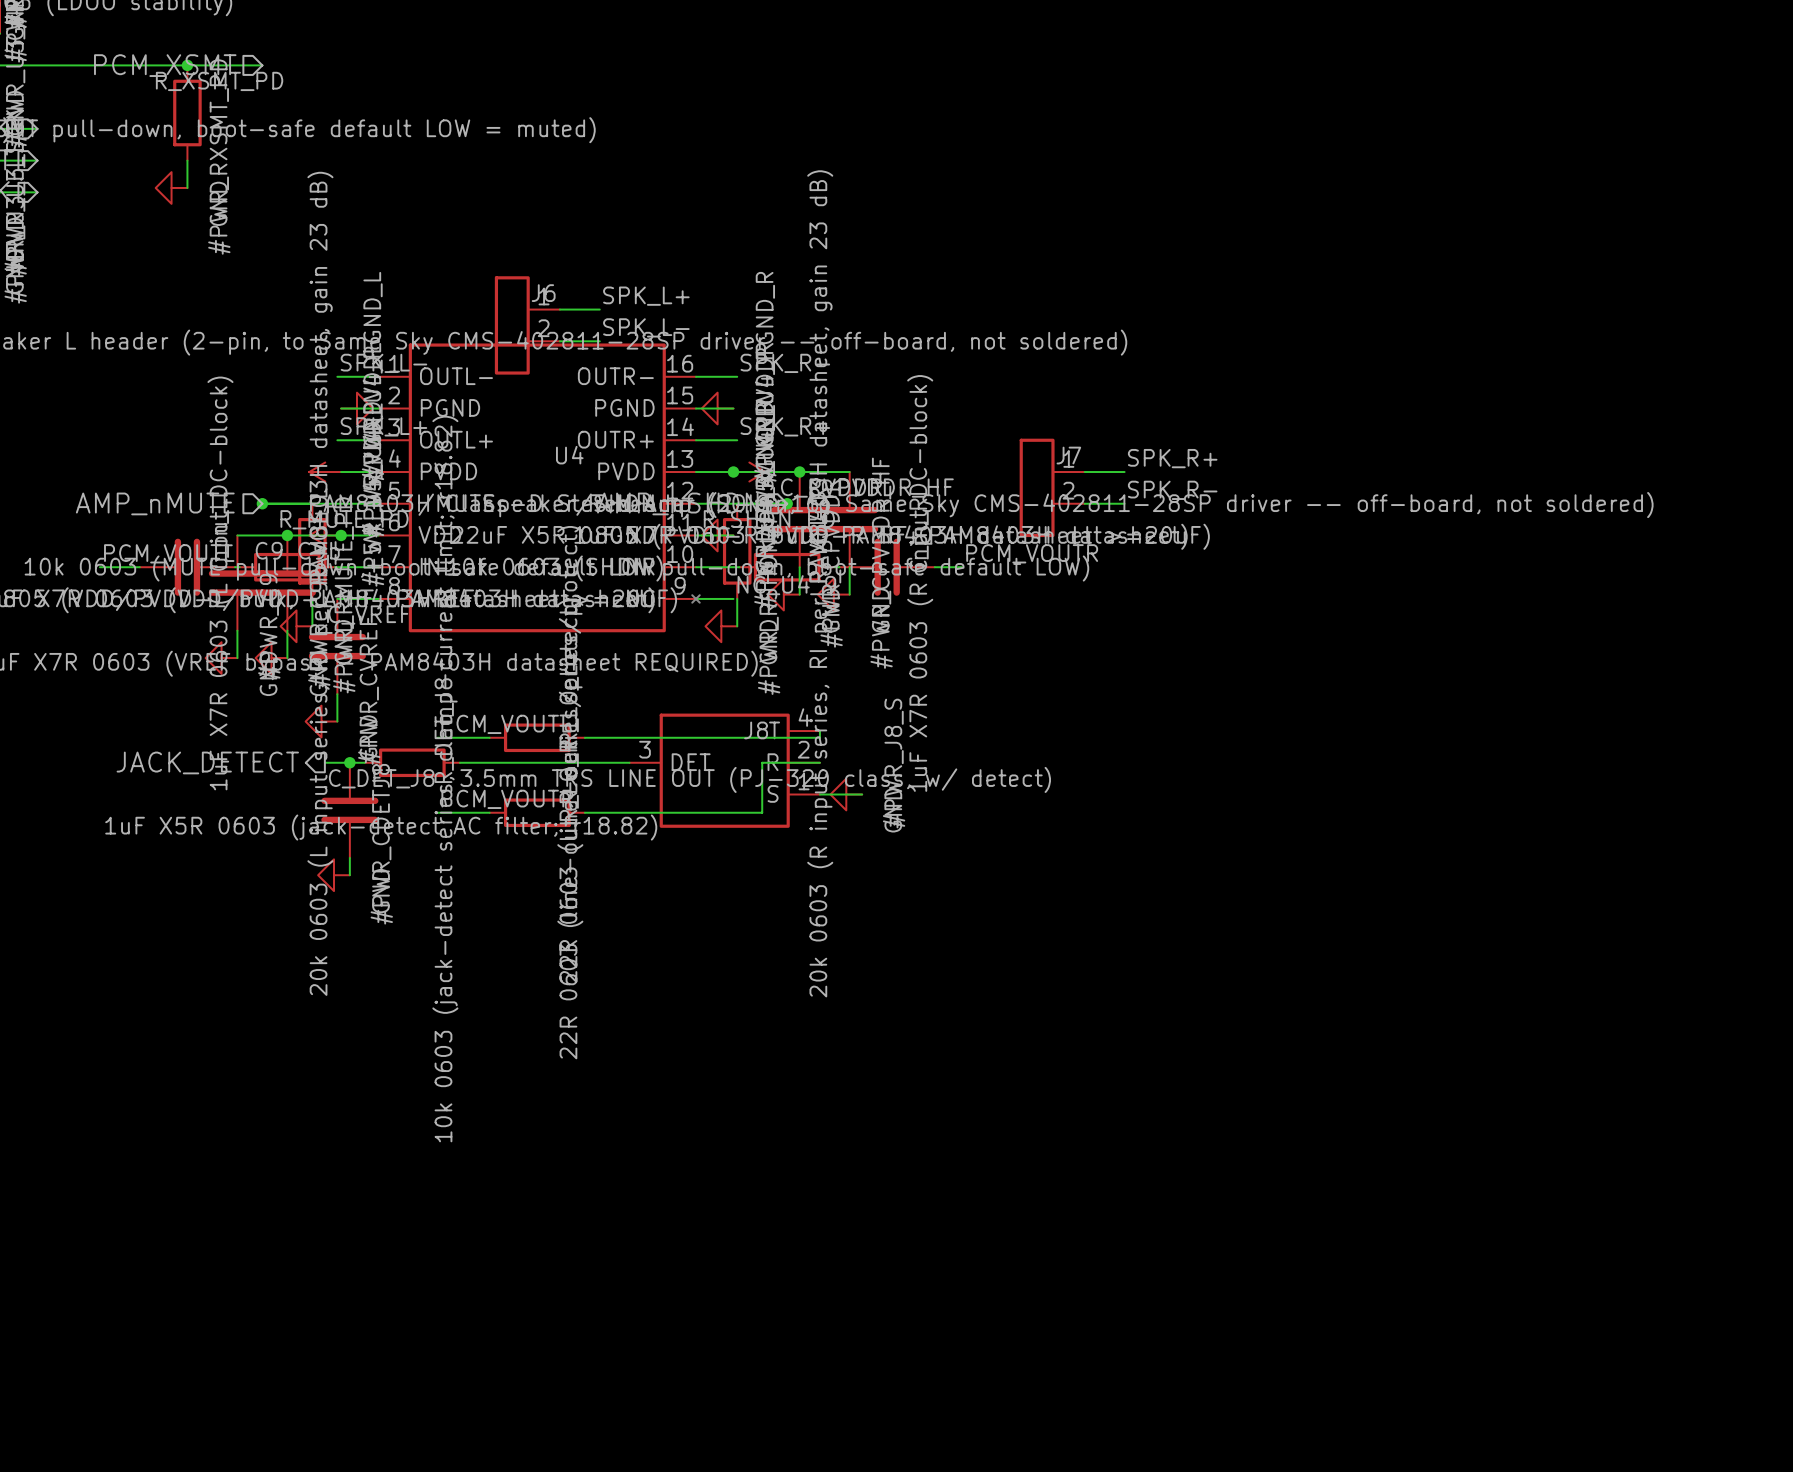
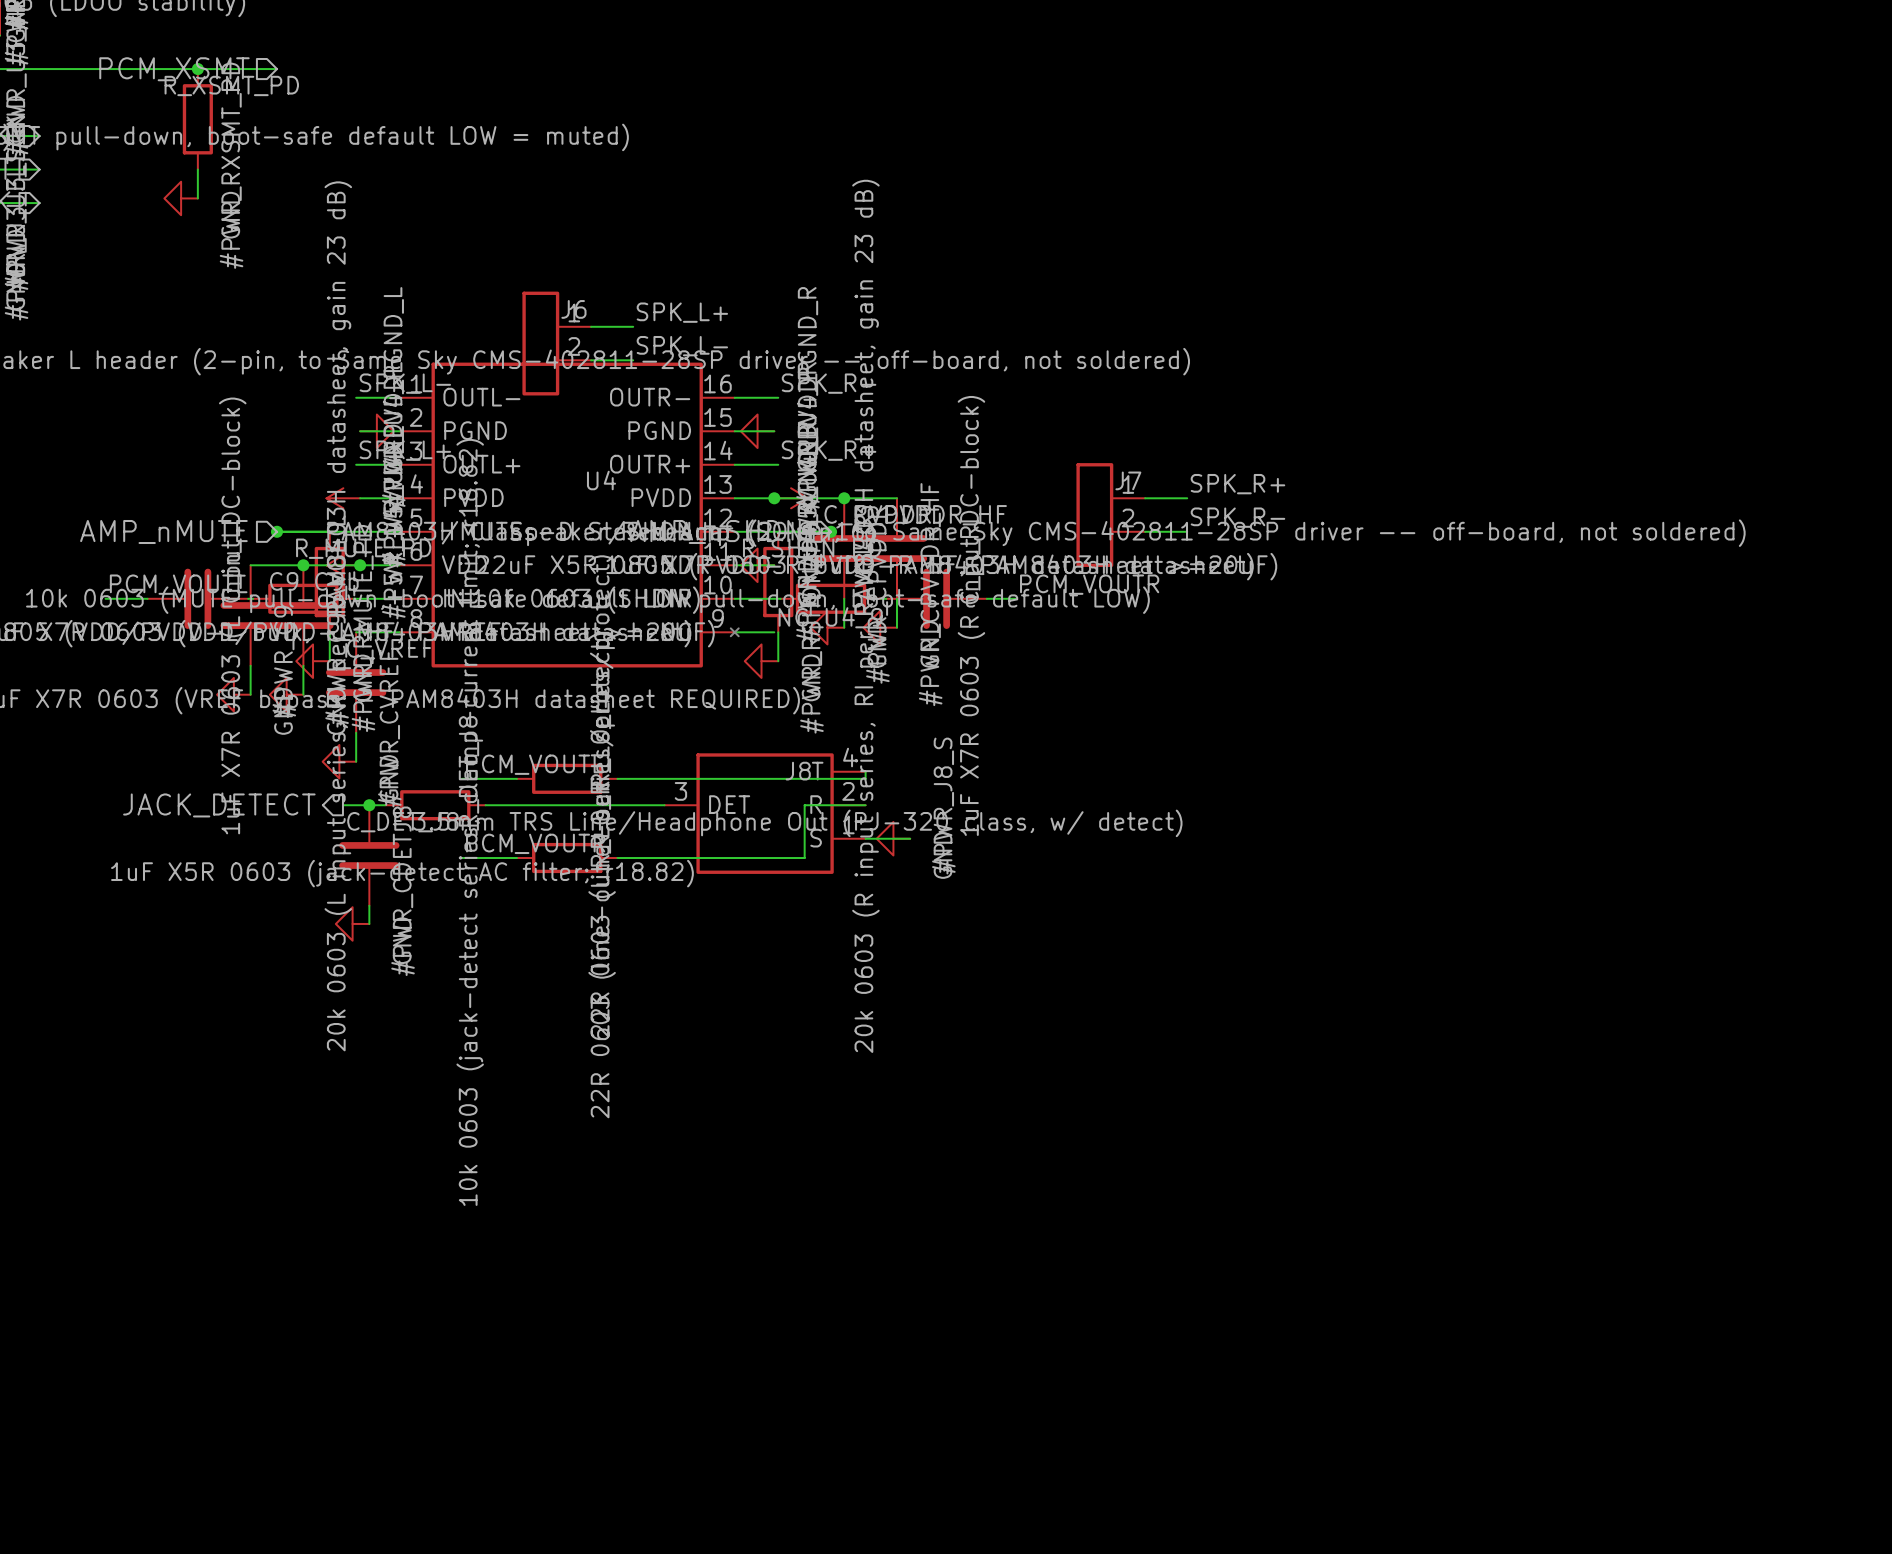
J8 value: 3.5mm TRS LINE OUT (PJ-320 class, w/ detect) (755, 779) -> 3.5mm TRS Line/Headphone Out (PJ-320 class, w/ detect) (797, 823)

